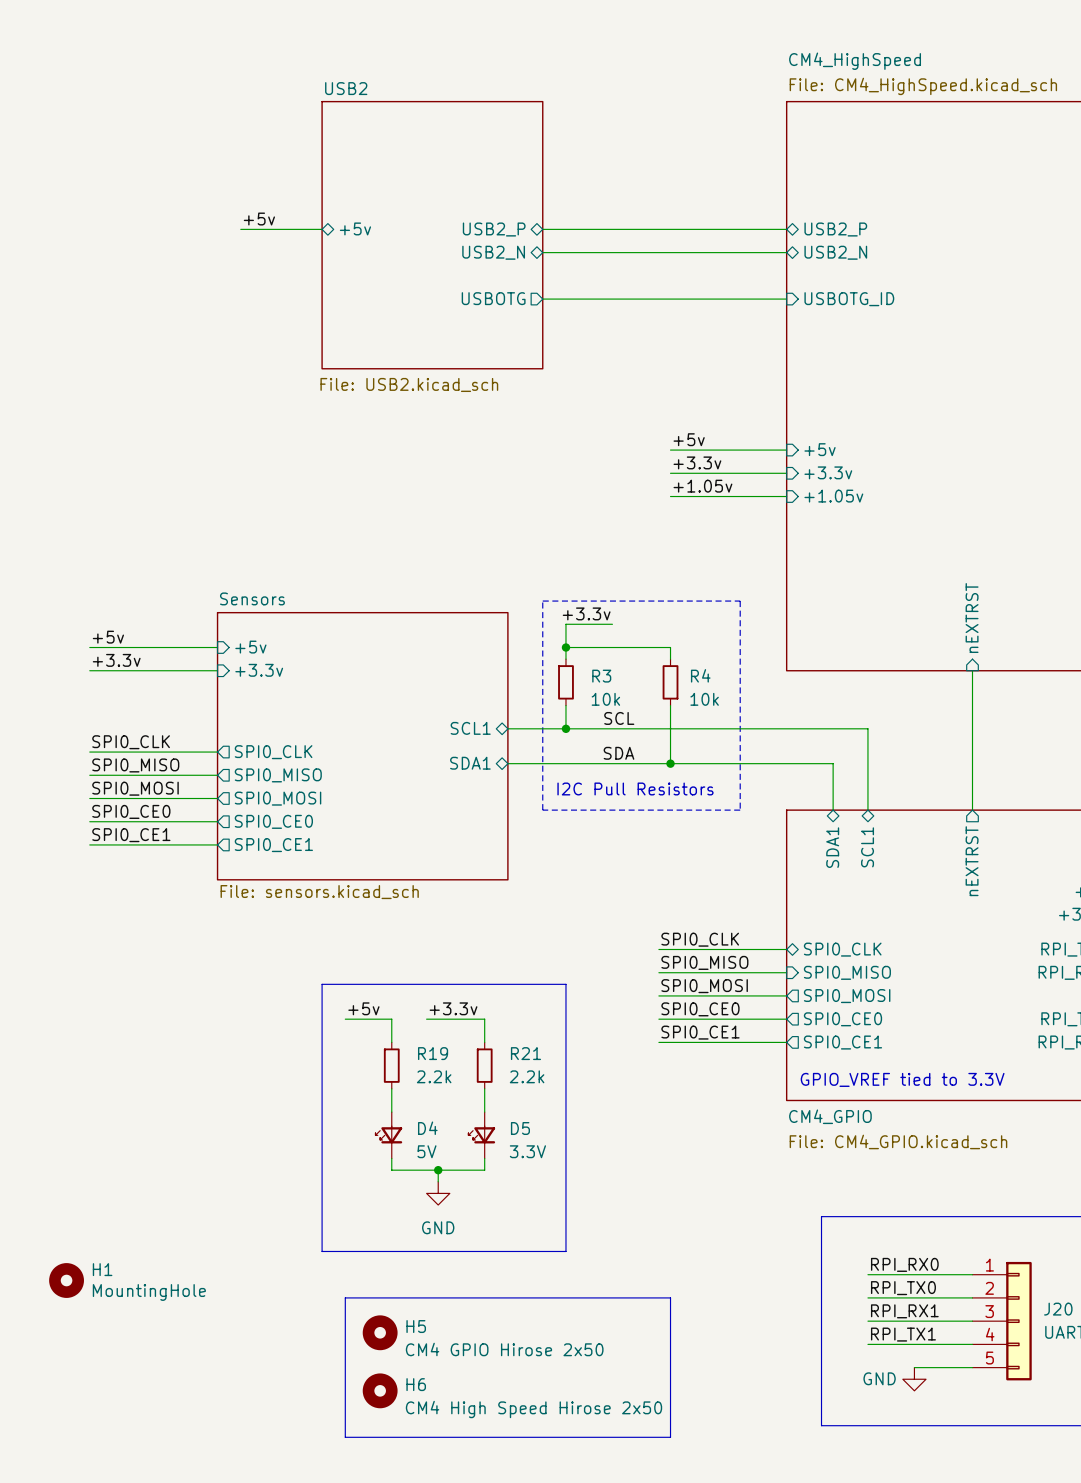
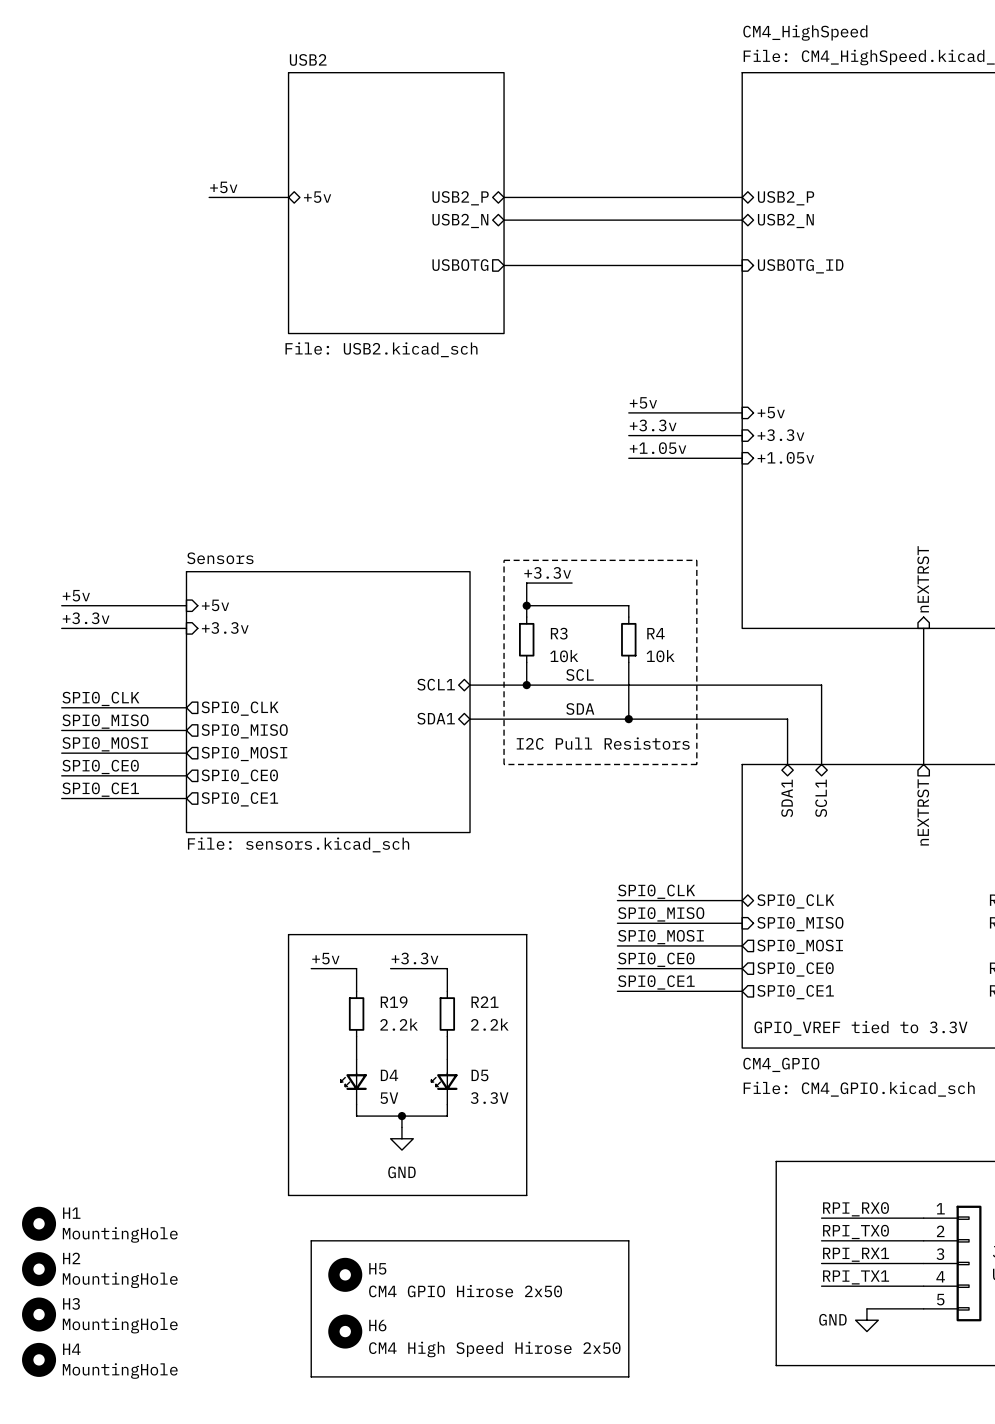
H2: none -> MountingHole (39, 1269)
H3: none -> MountingHole (39, 1314)
H4: none -> MountingHole (39, 1359)

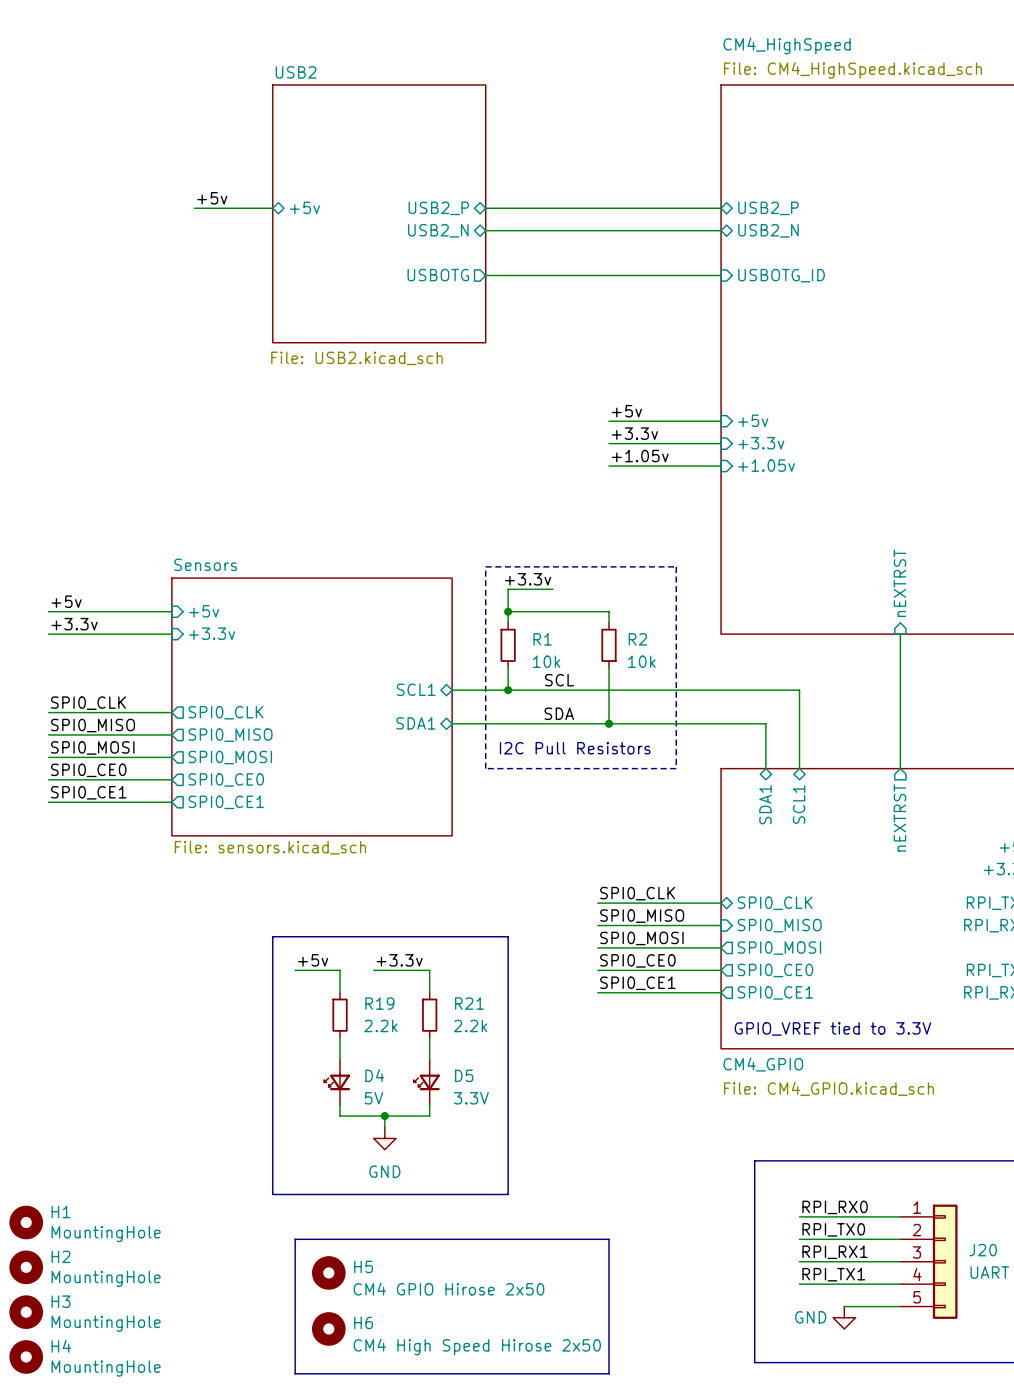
R3 name: R3 (559, 633) -> R1 (542, 639)
R4 name: R4 (655, 633) -> R2 (637, 639)

